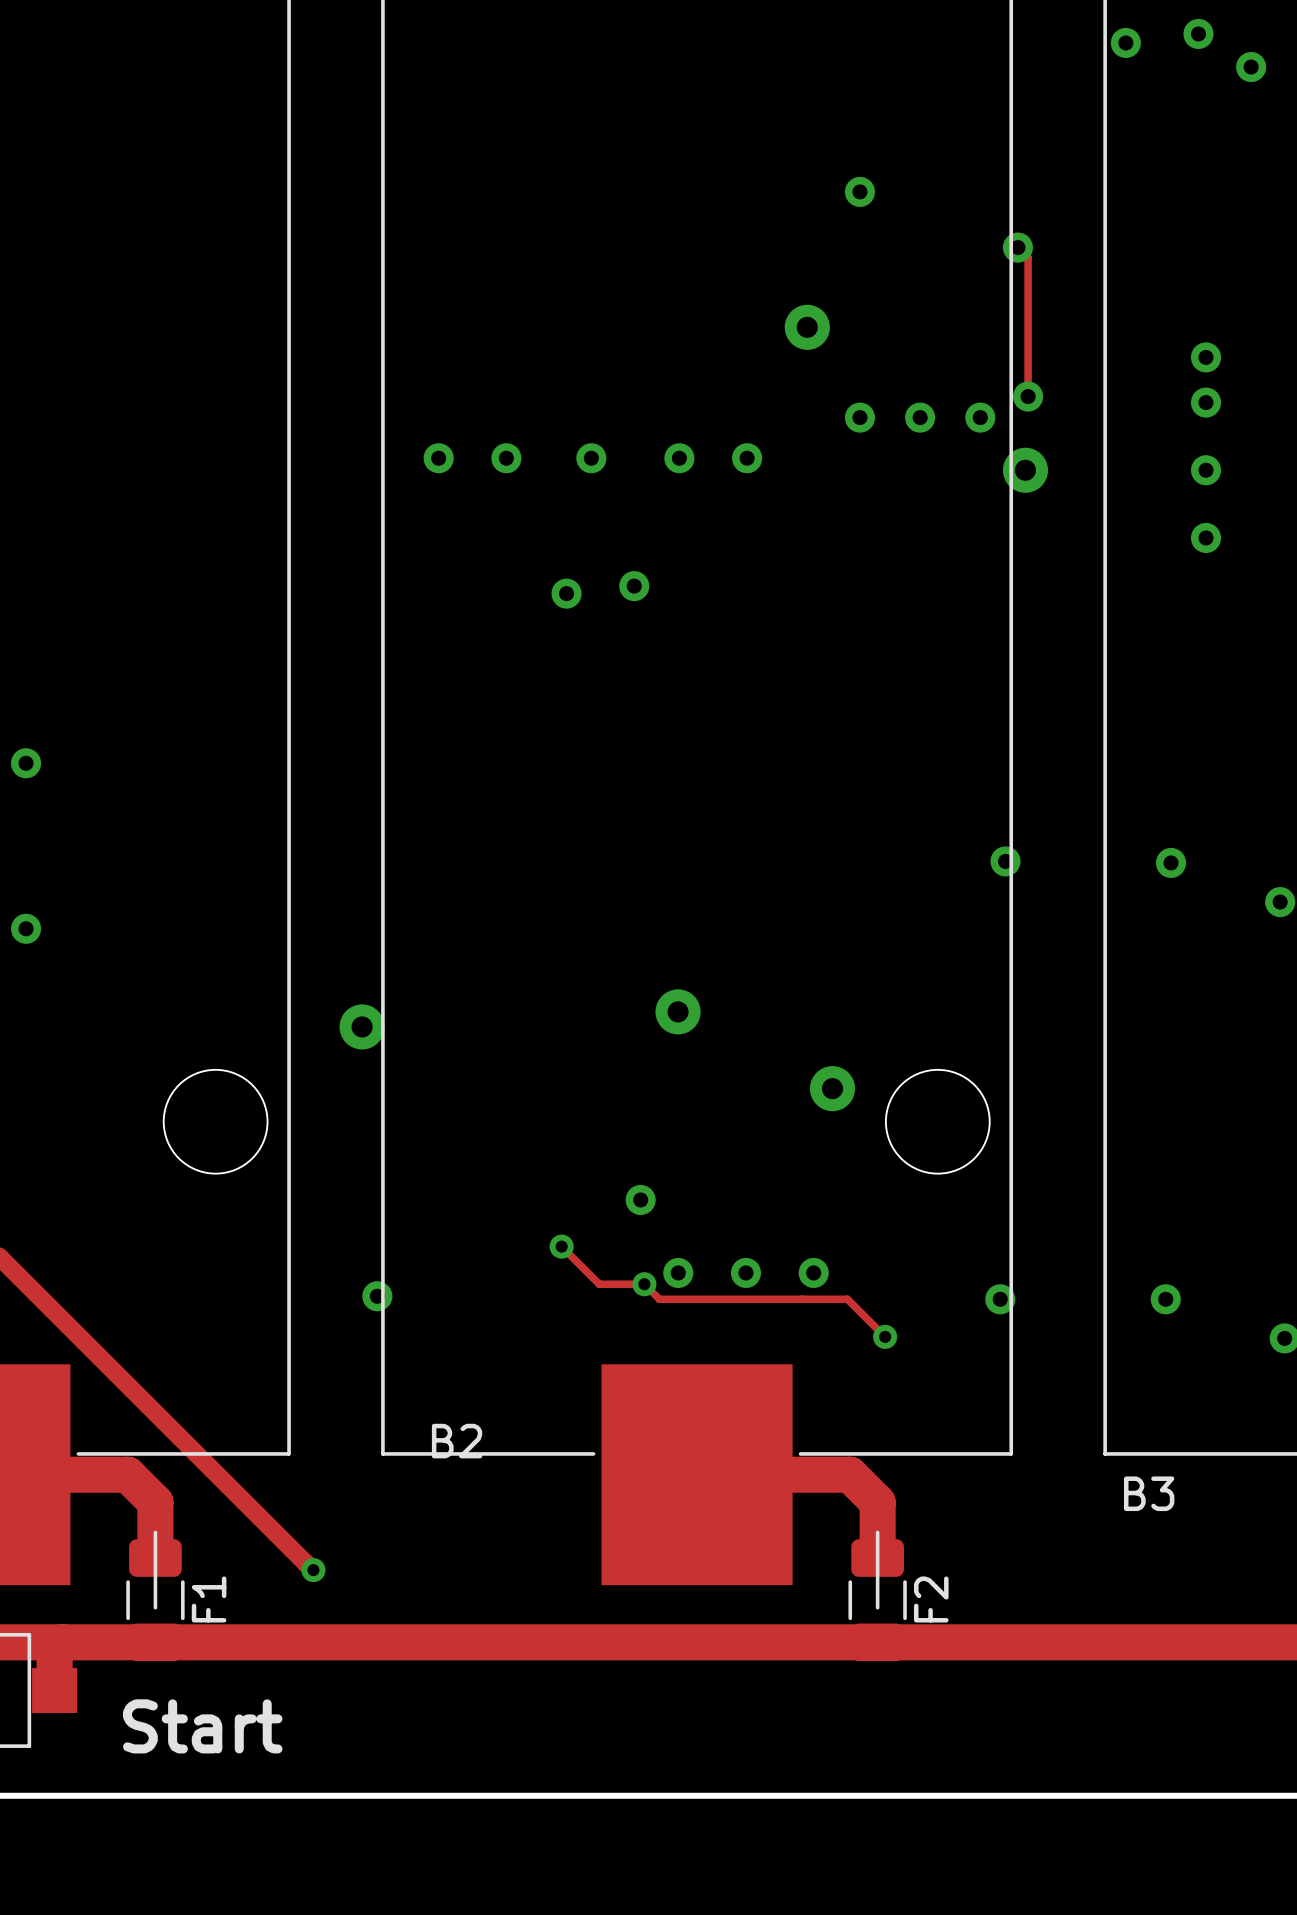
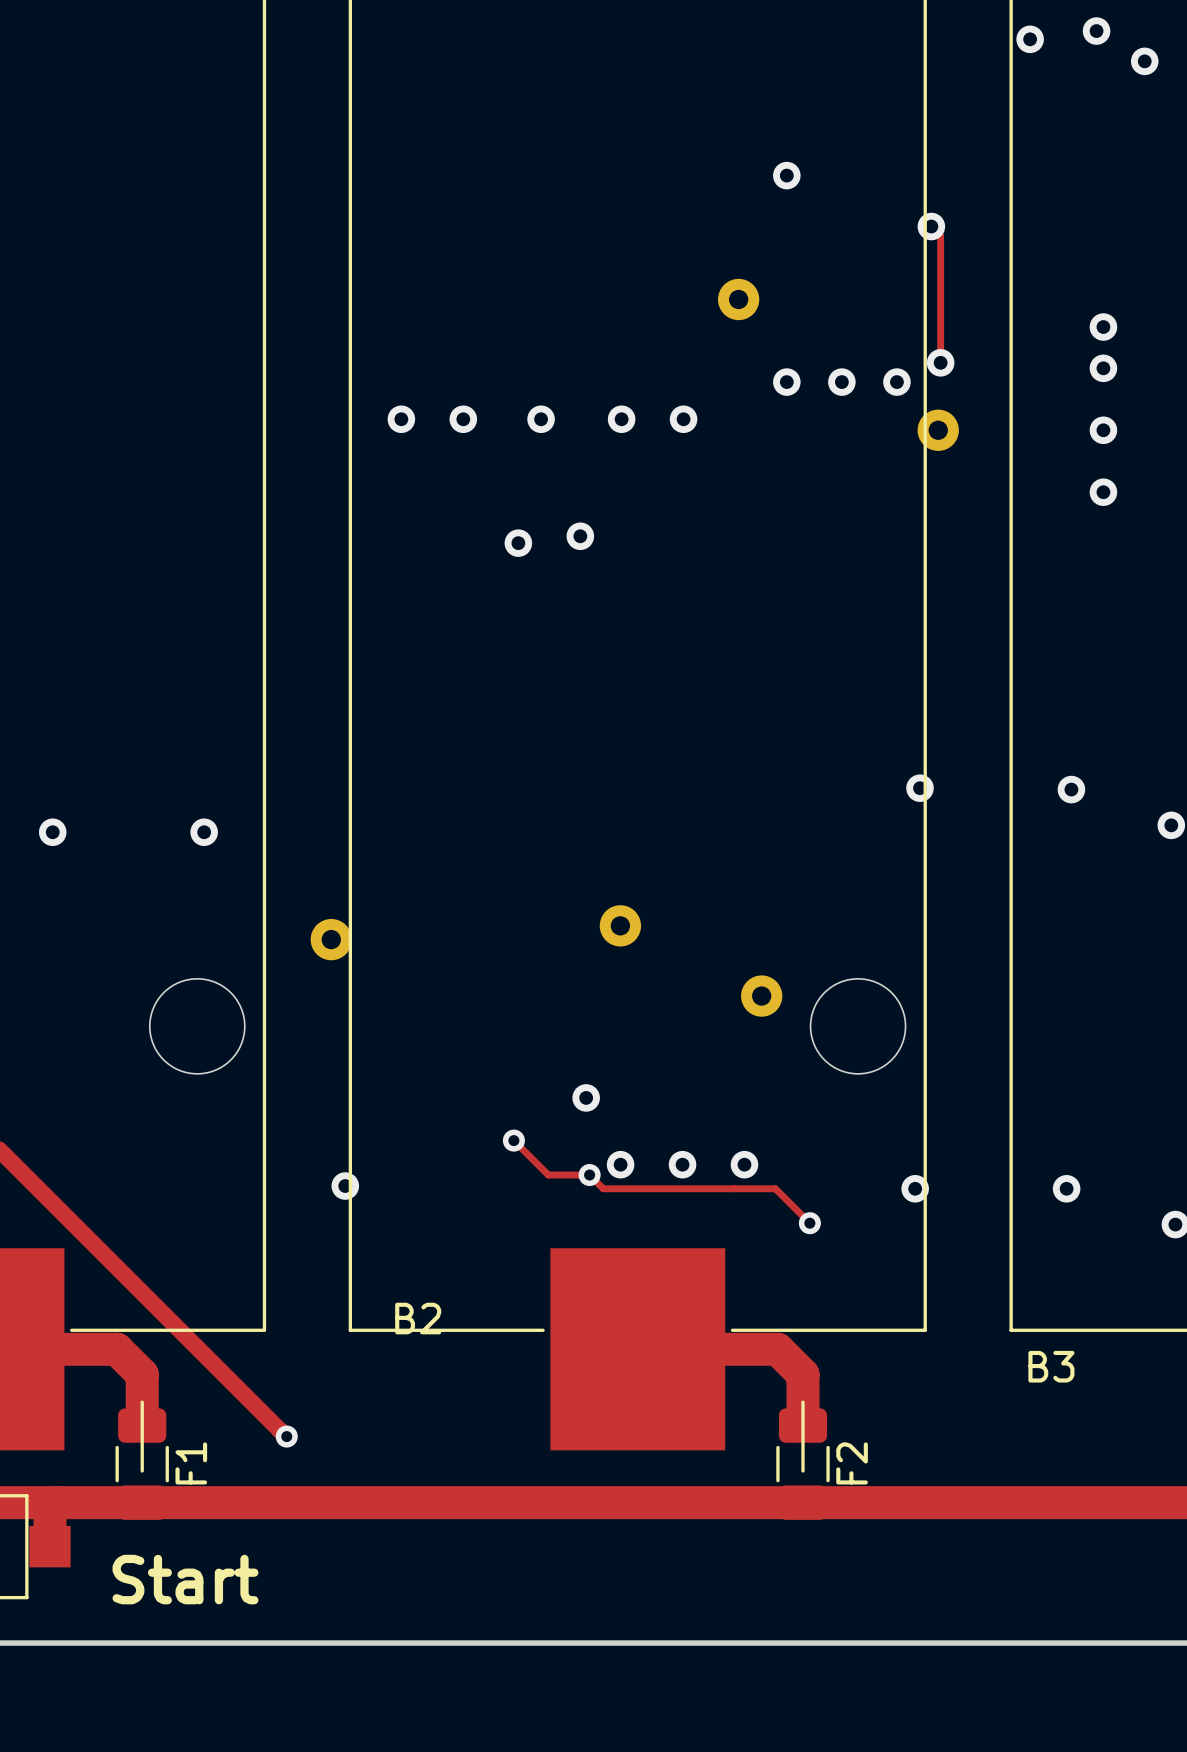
via: (26, 763) -> none
via: none -> (204, 832)
via position: (26, 928) -> (52, 832)

